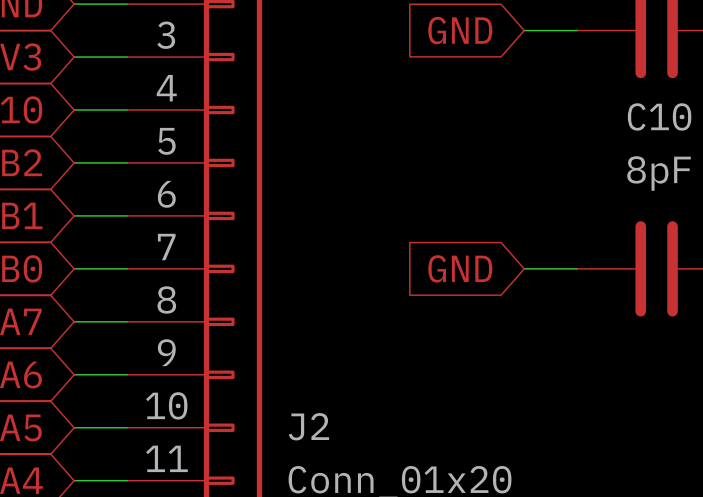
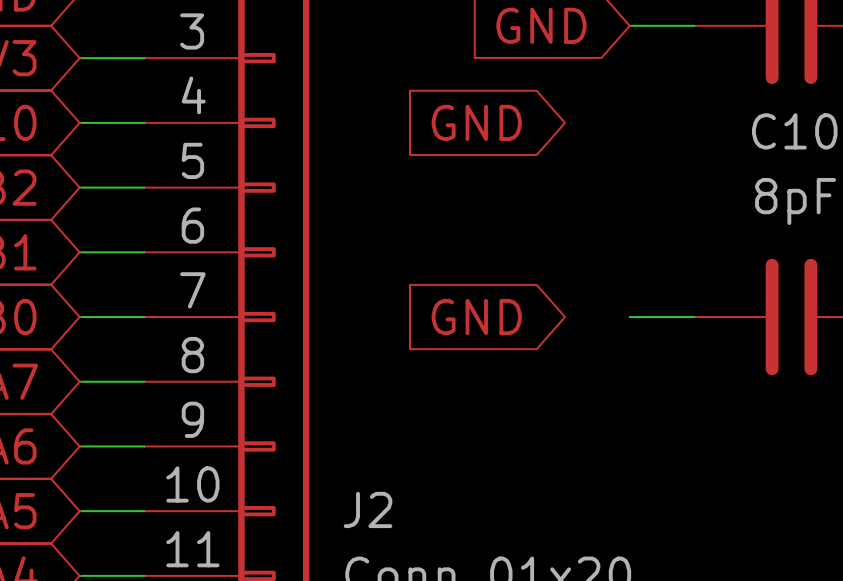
global label: none -> GND (476, 122)
global label position: GND (460, 268) -> GND (476, 317)

